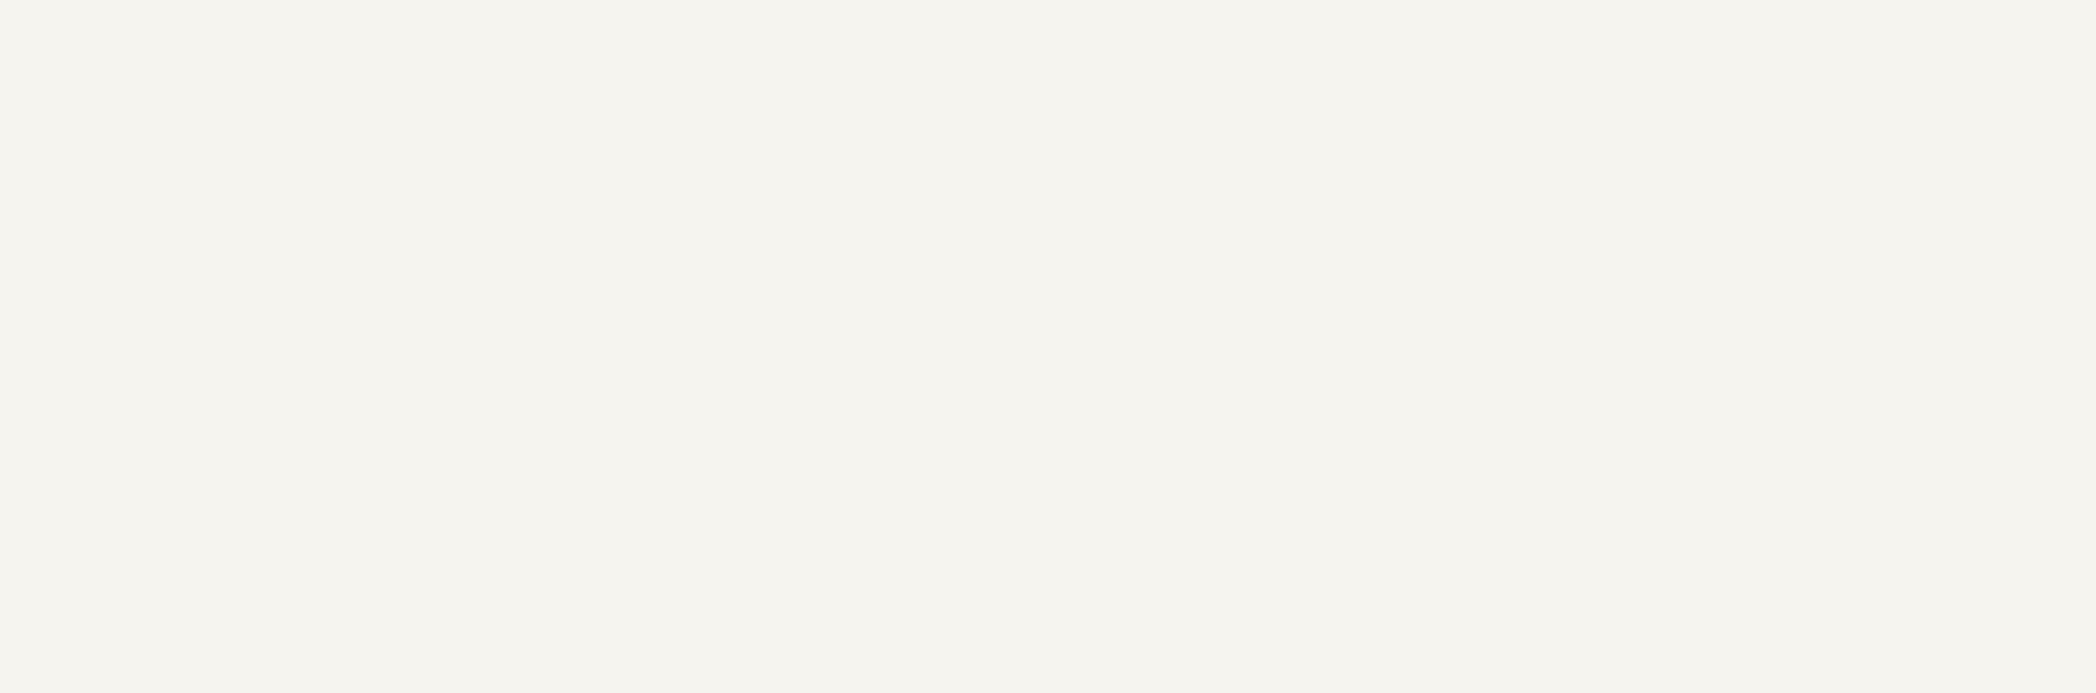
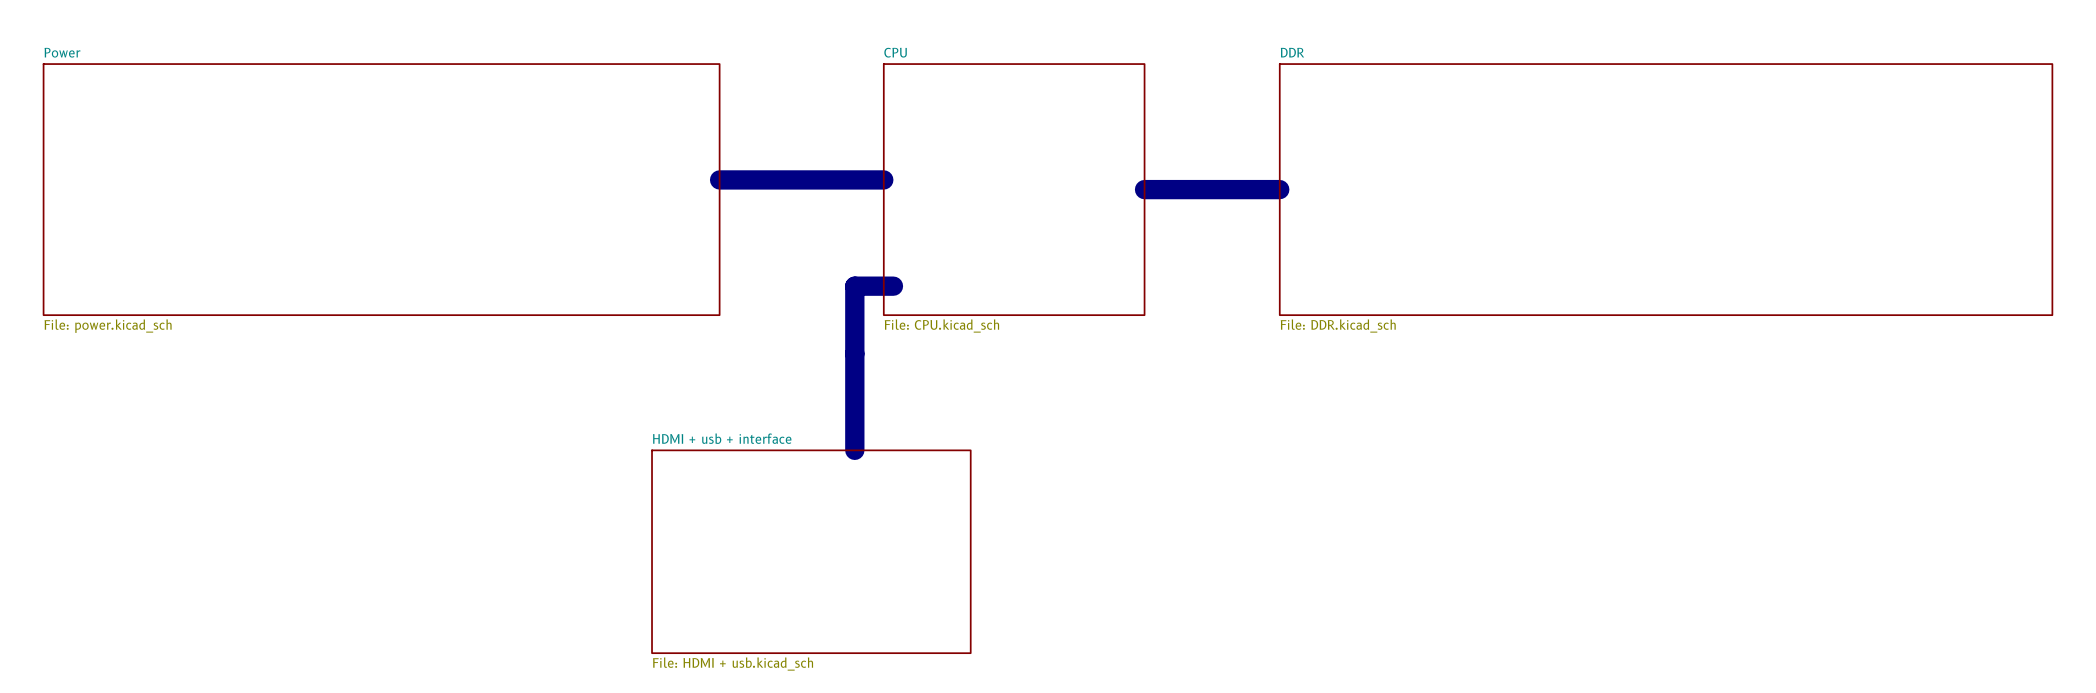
line: none -> (719, 179) (883, 179)
sheet Power: none -> File: power.kicad_sch (381, 189)
sheet CPU: none -> File: CPU.kicad_sch (1014, 189)
line: none -> (1144, 189) (1279, 189)
sheet DDR: none -> File: DDR.kicad_sch (1666, 189)
line: none -> (893, 286) (854, 286) (854, 450)
sheet HDMI + usb + interface: none -> File: HDMI + usb.kicad_sch (811, 551)

